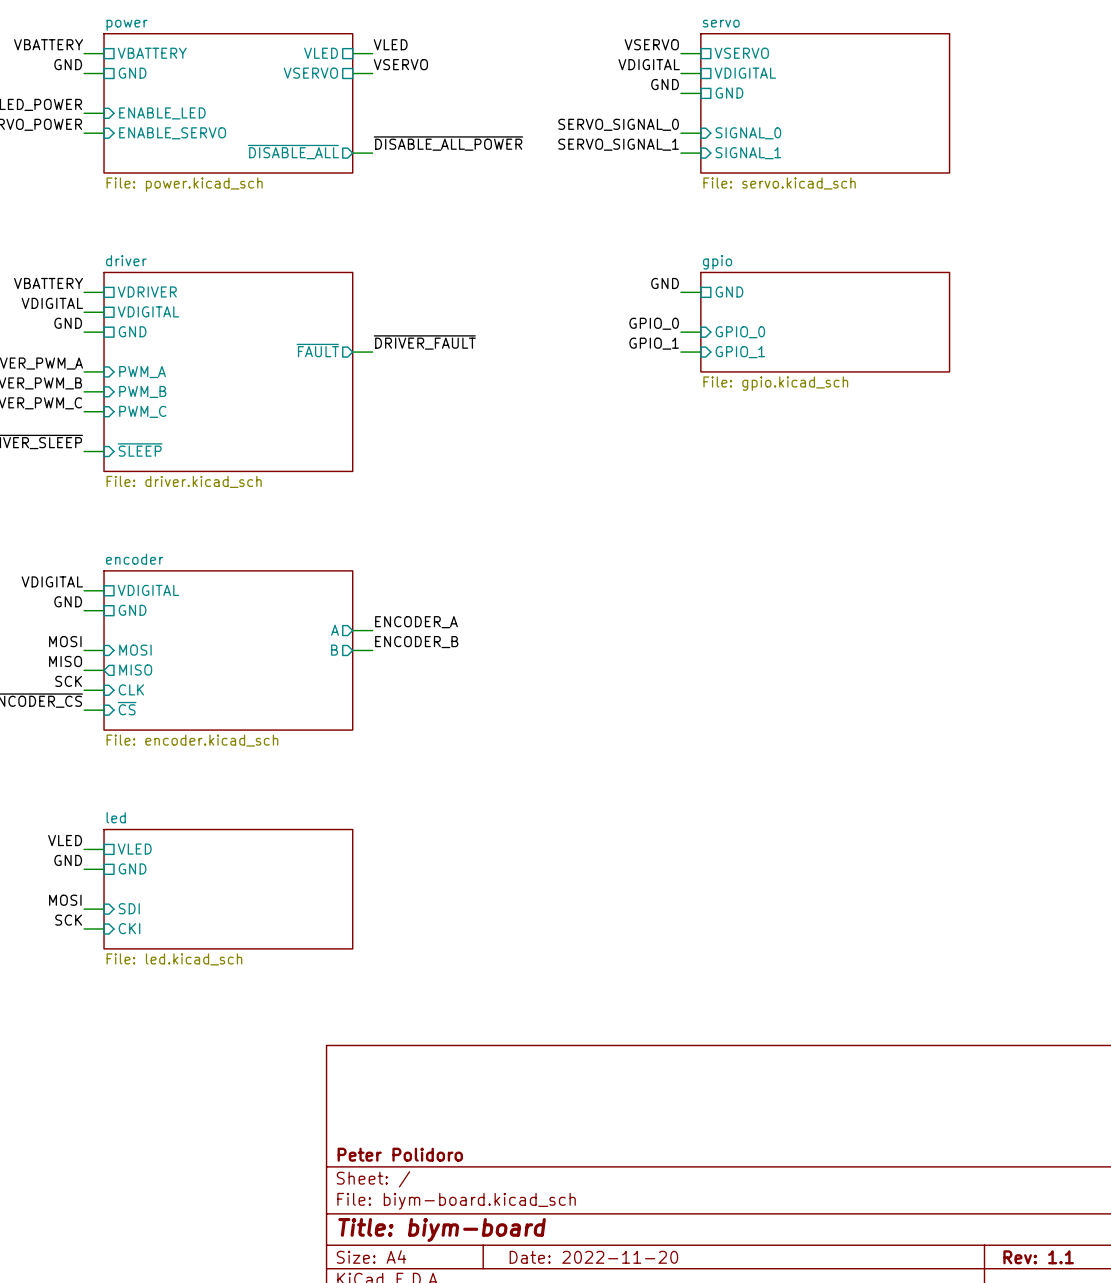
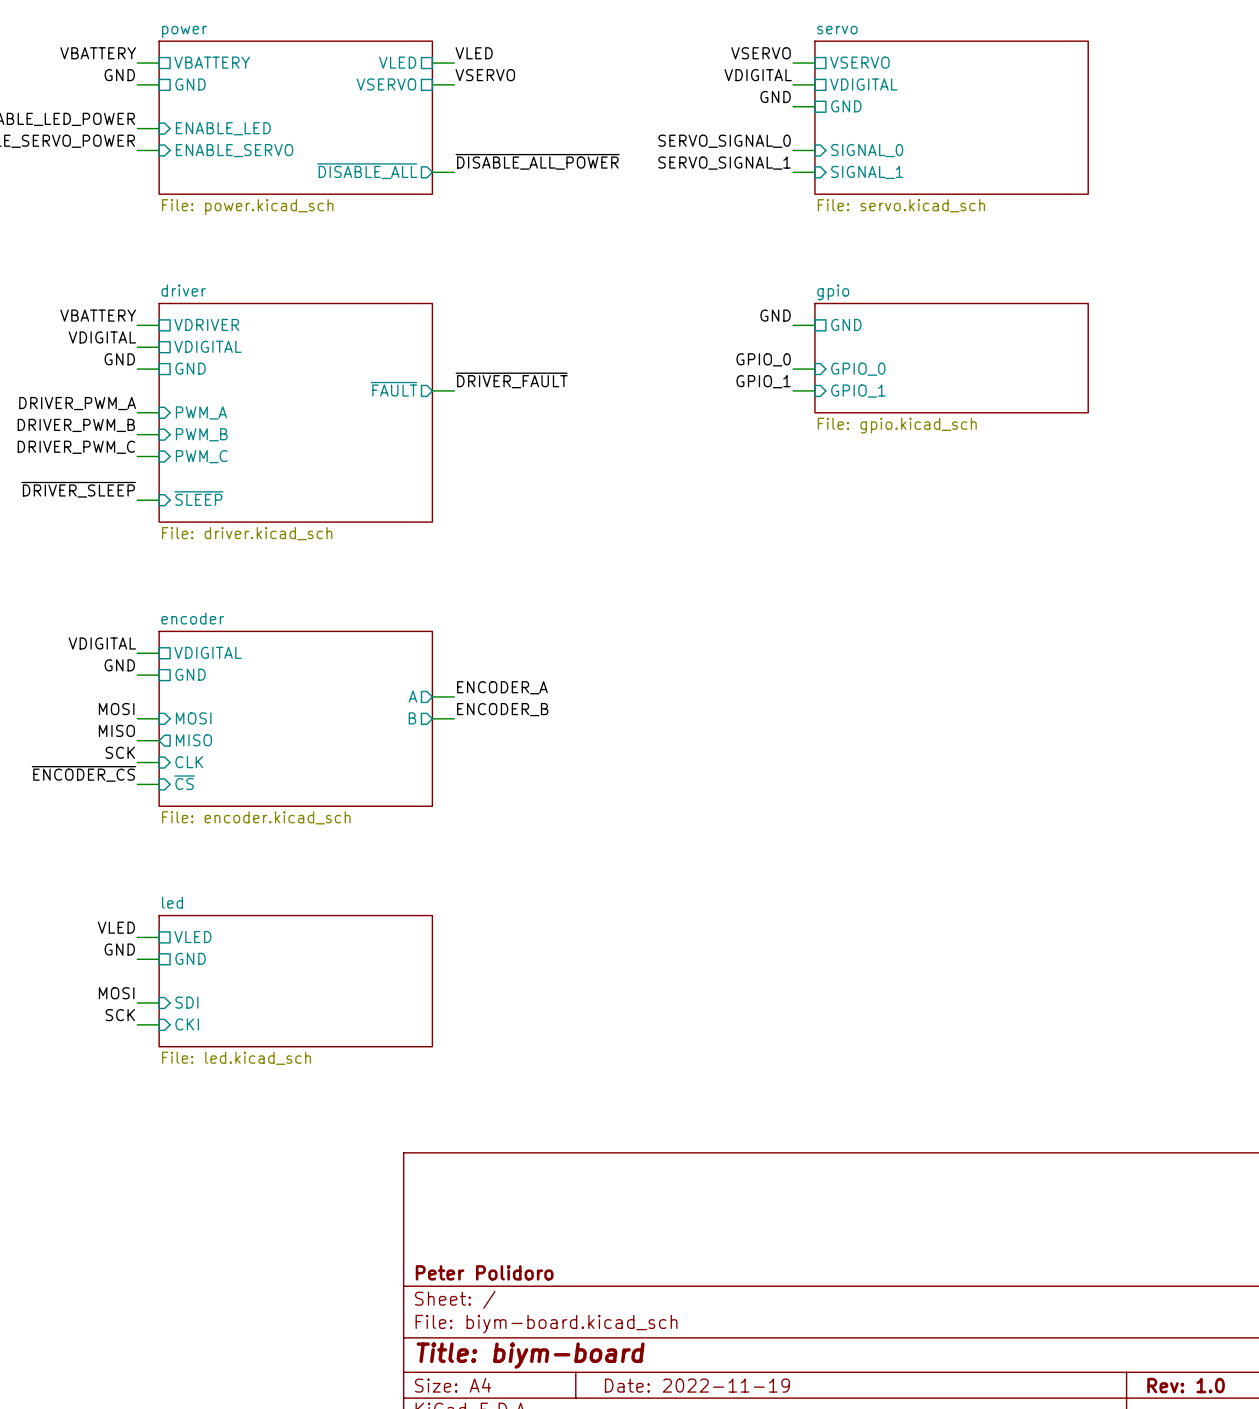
title block: Date: 2022-11-20 (593, 1257) -> Date: 2022-11-19 (697, 1385)
title block: Rev: 1.1 (1038, 1257) -> Rev: 1.0 (1186, 1385)

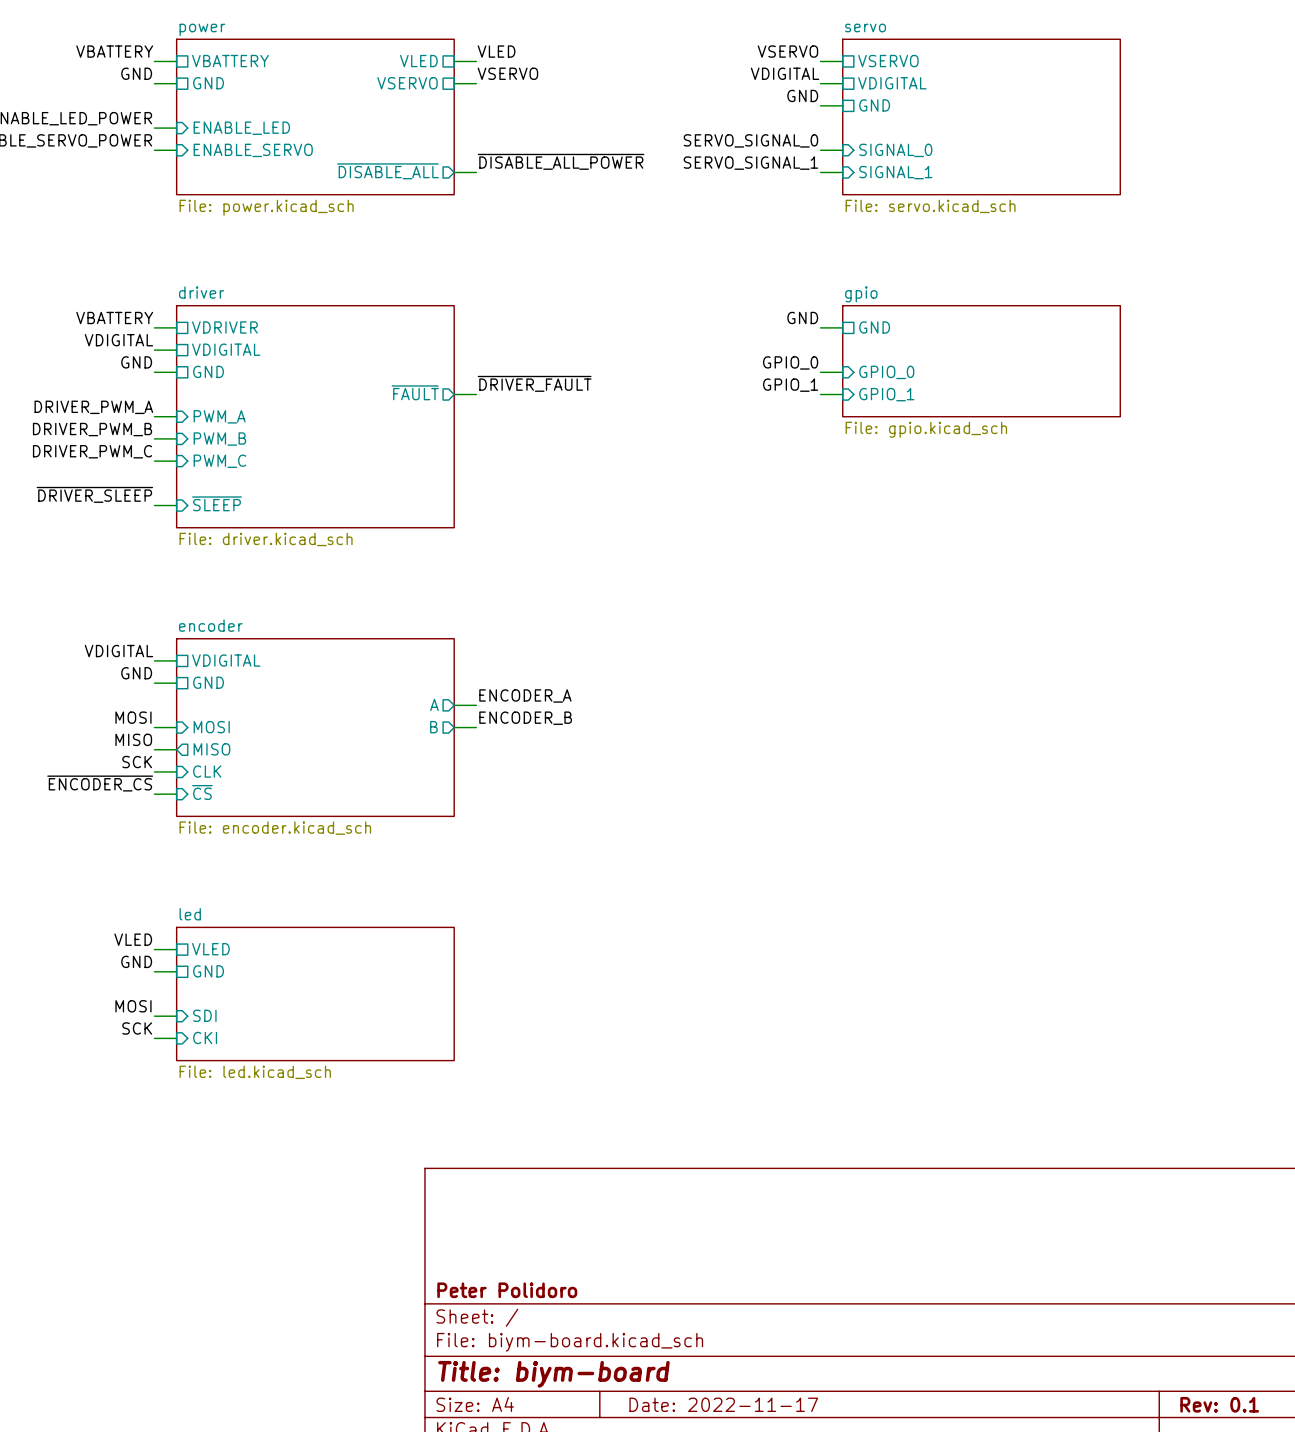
title block: Date: 2022-11-19 (697, 1385) -> Date: 2022-11-17 (723, 1404)
title block: Rev: 1.0 (1186, 1385) -> Rev: 0.1 (1219, 1404)

